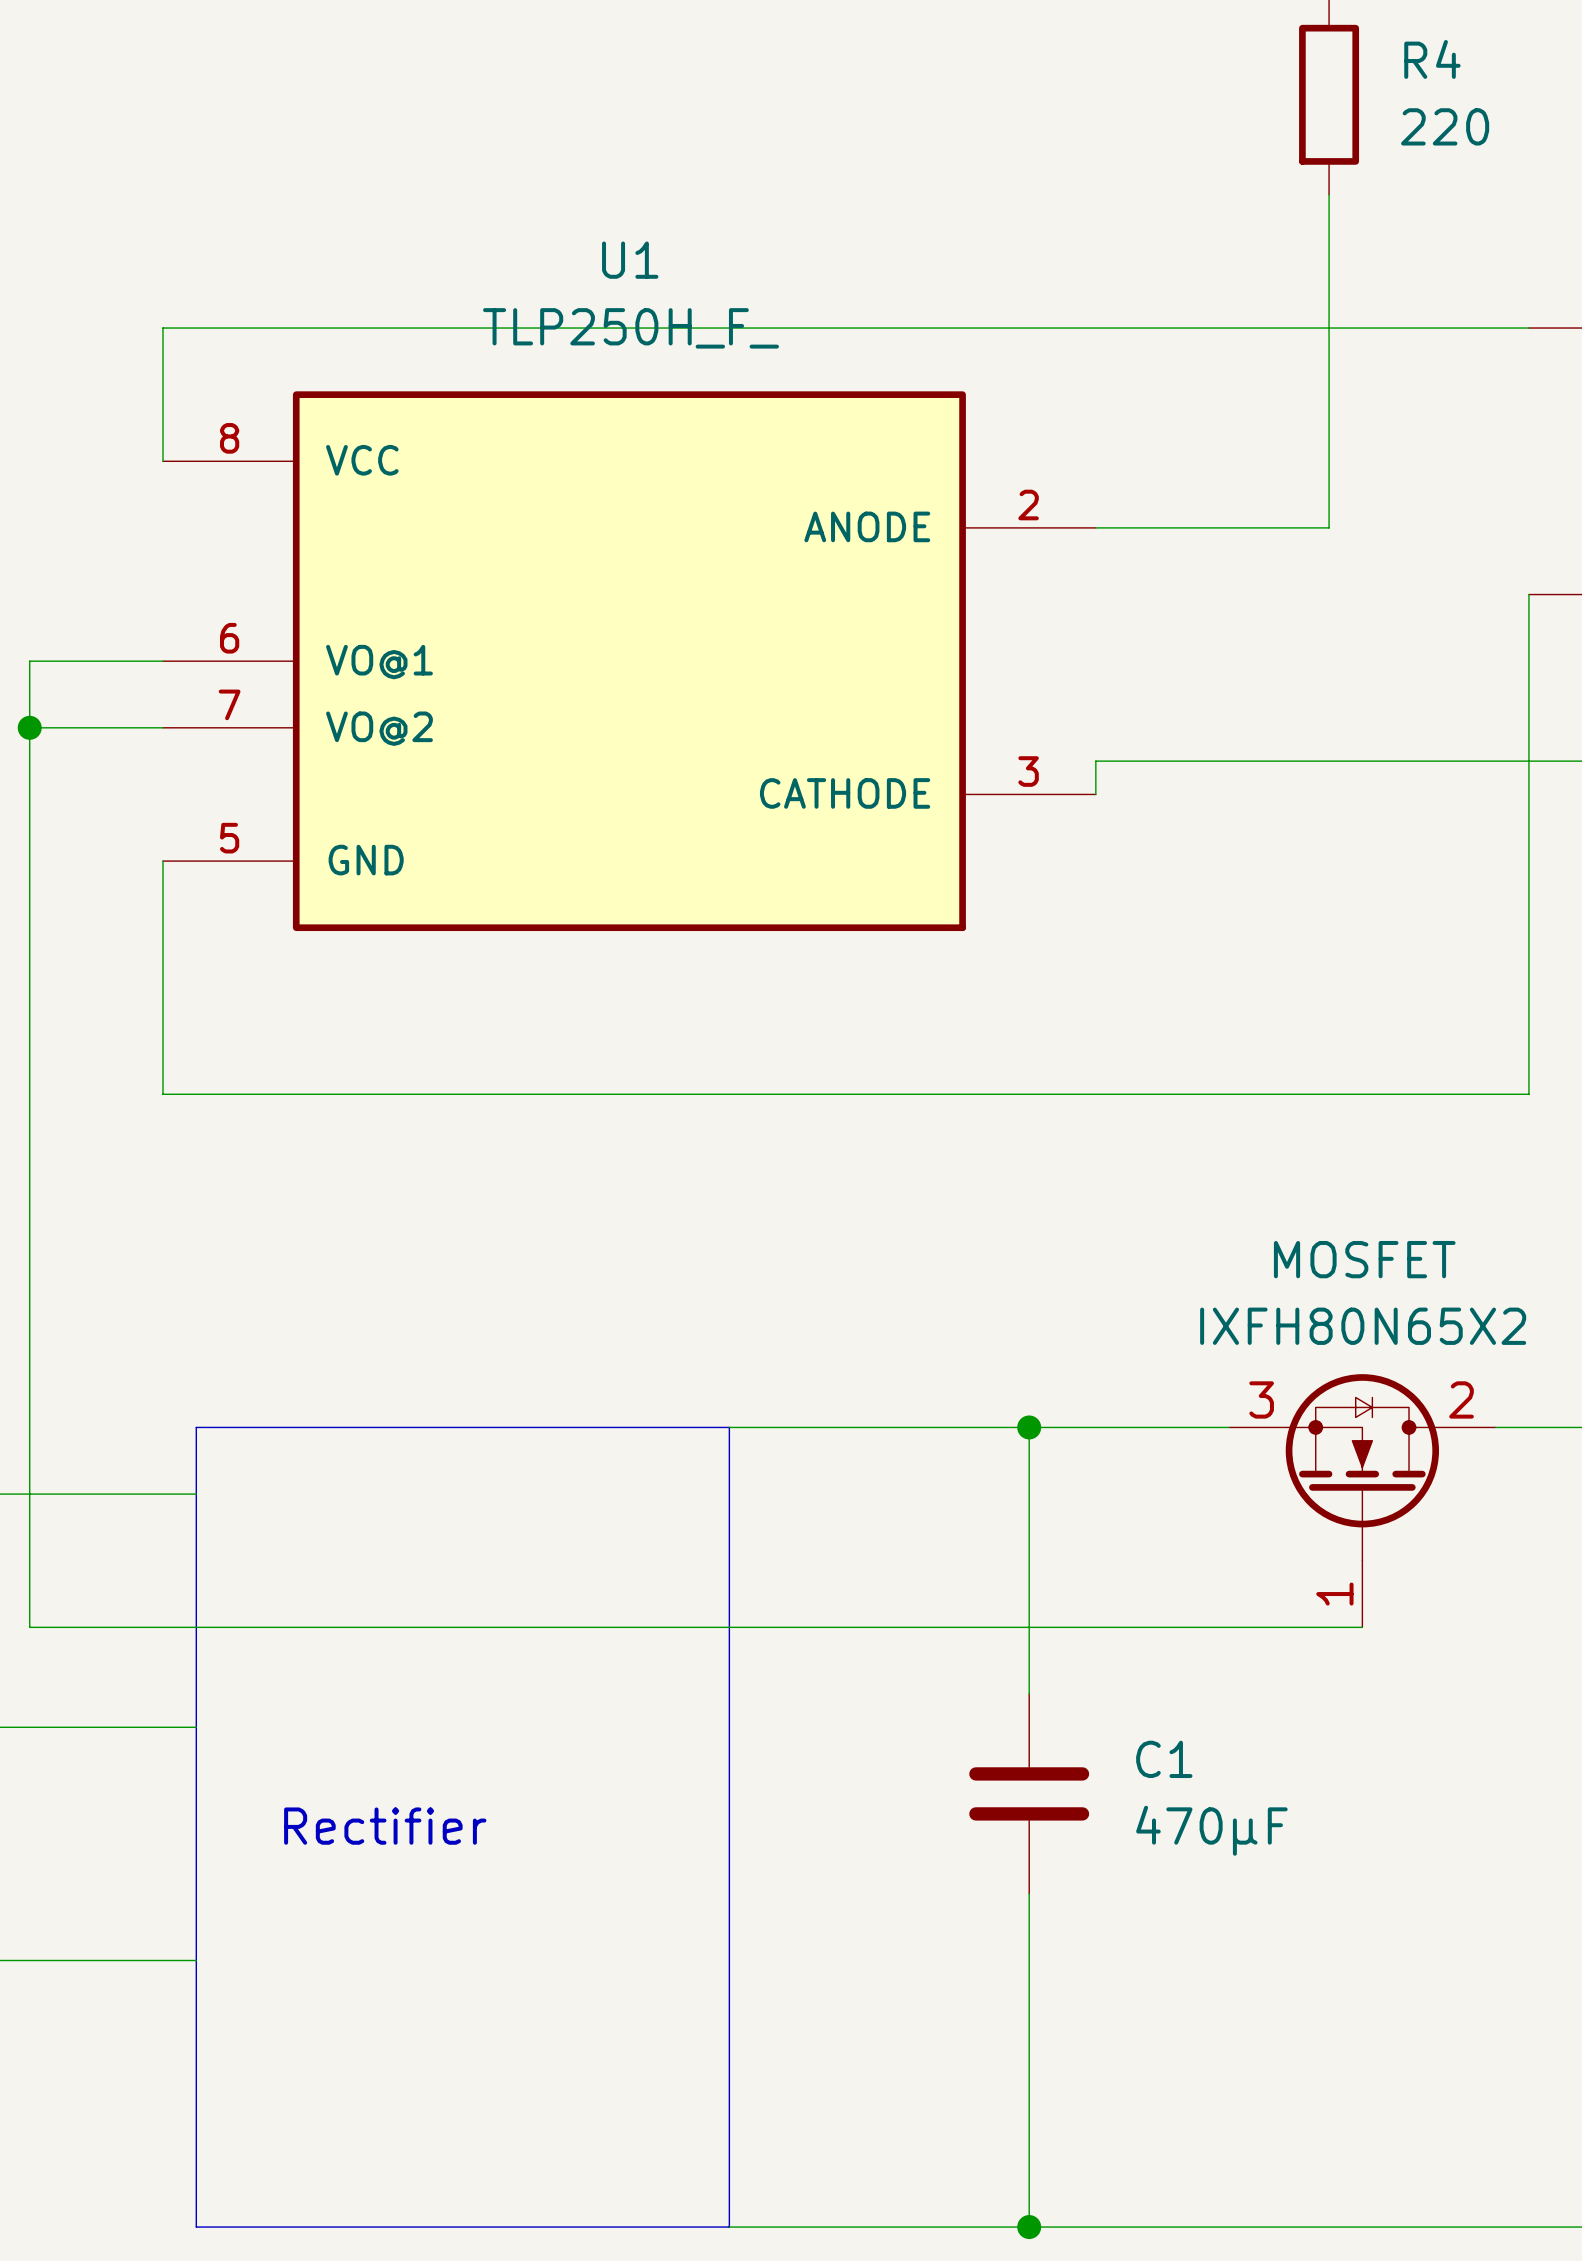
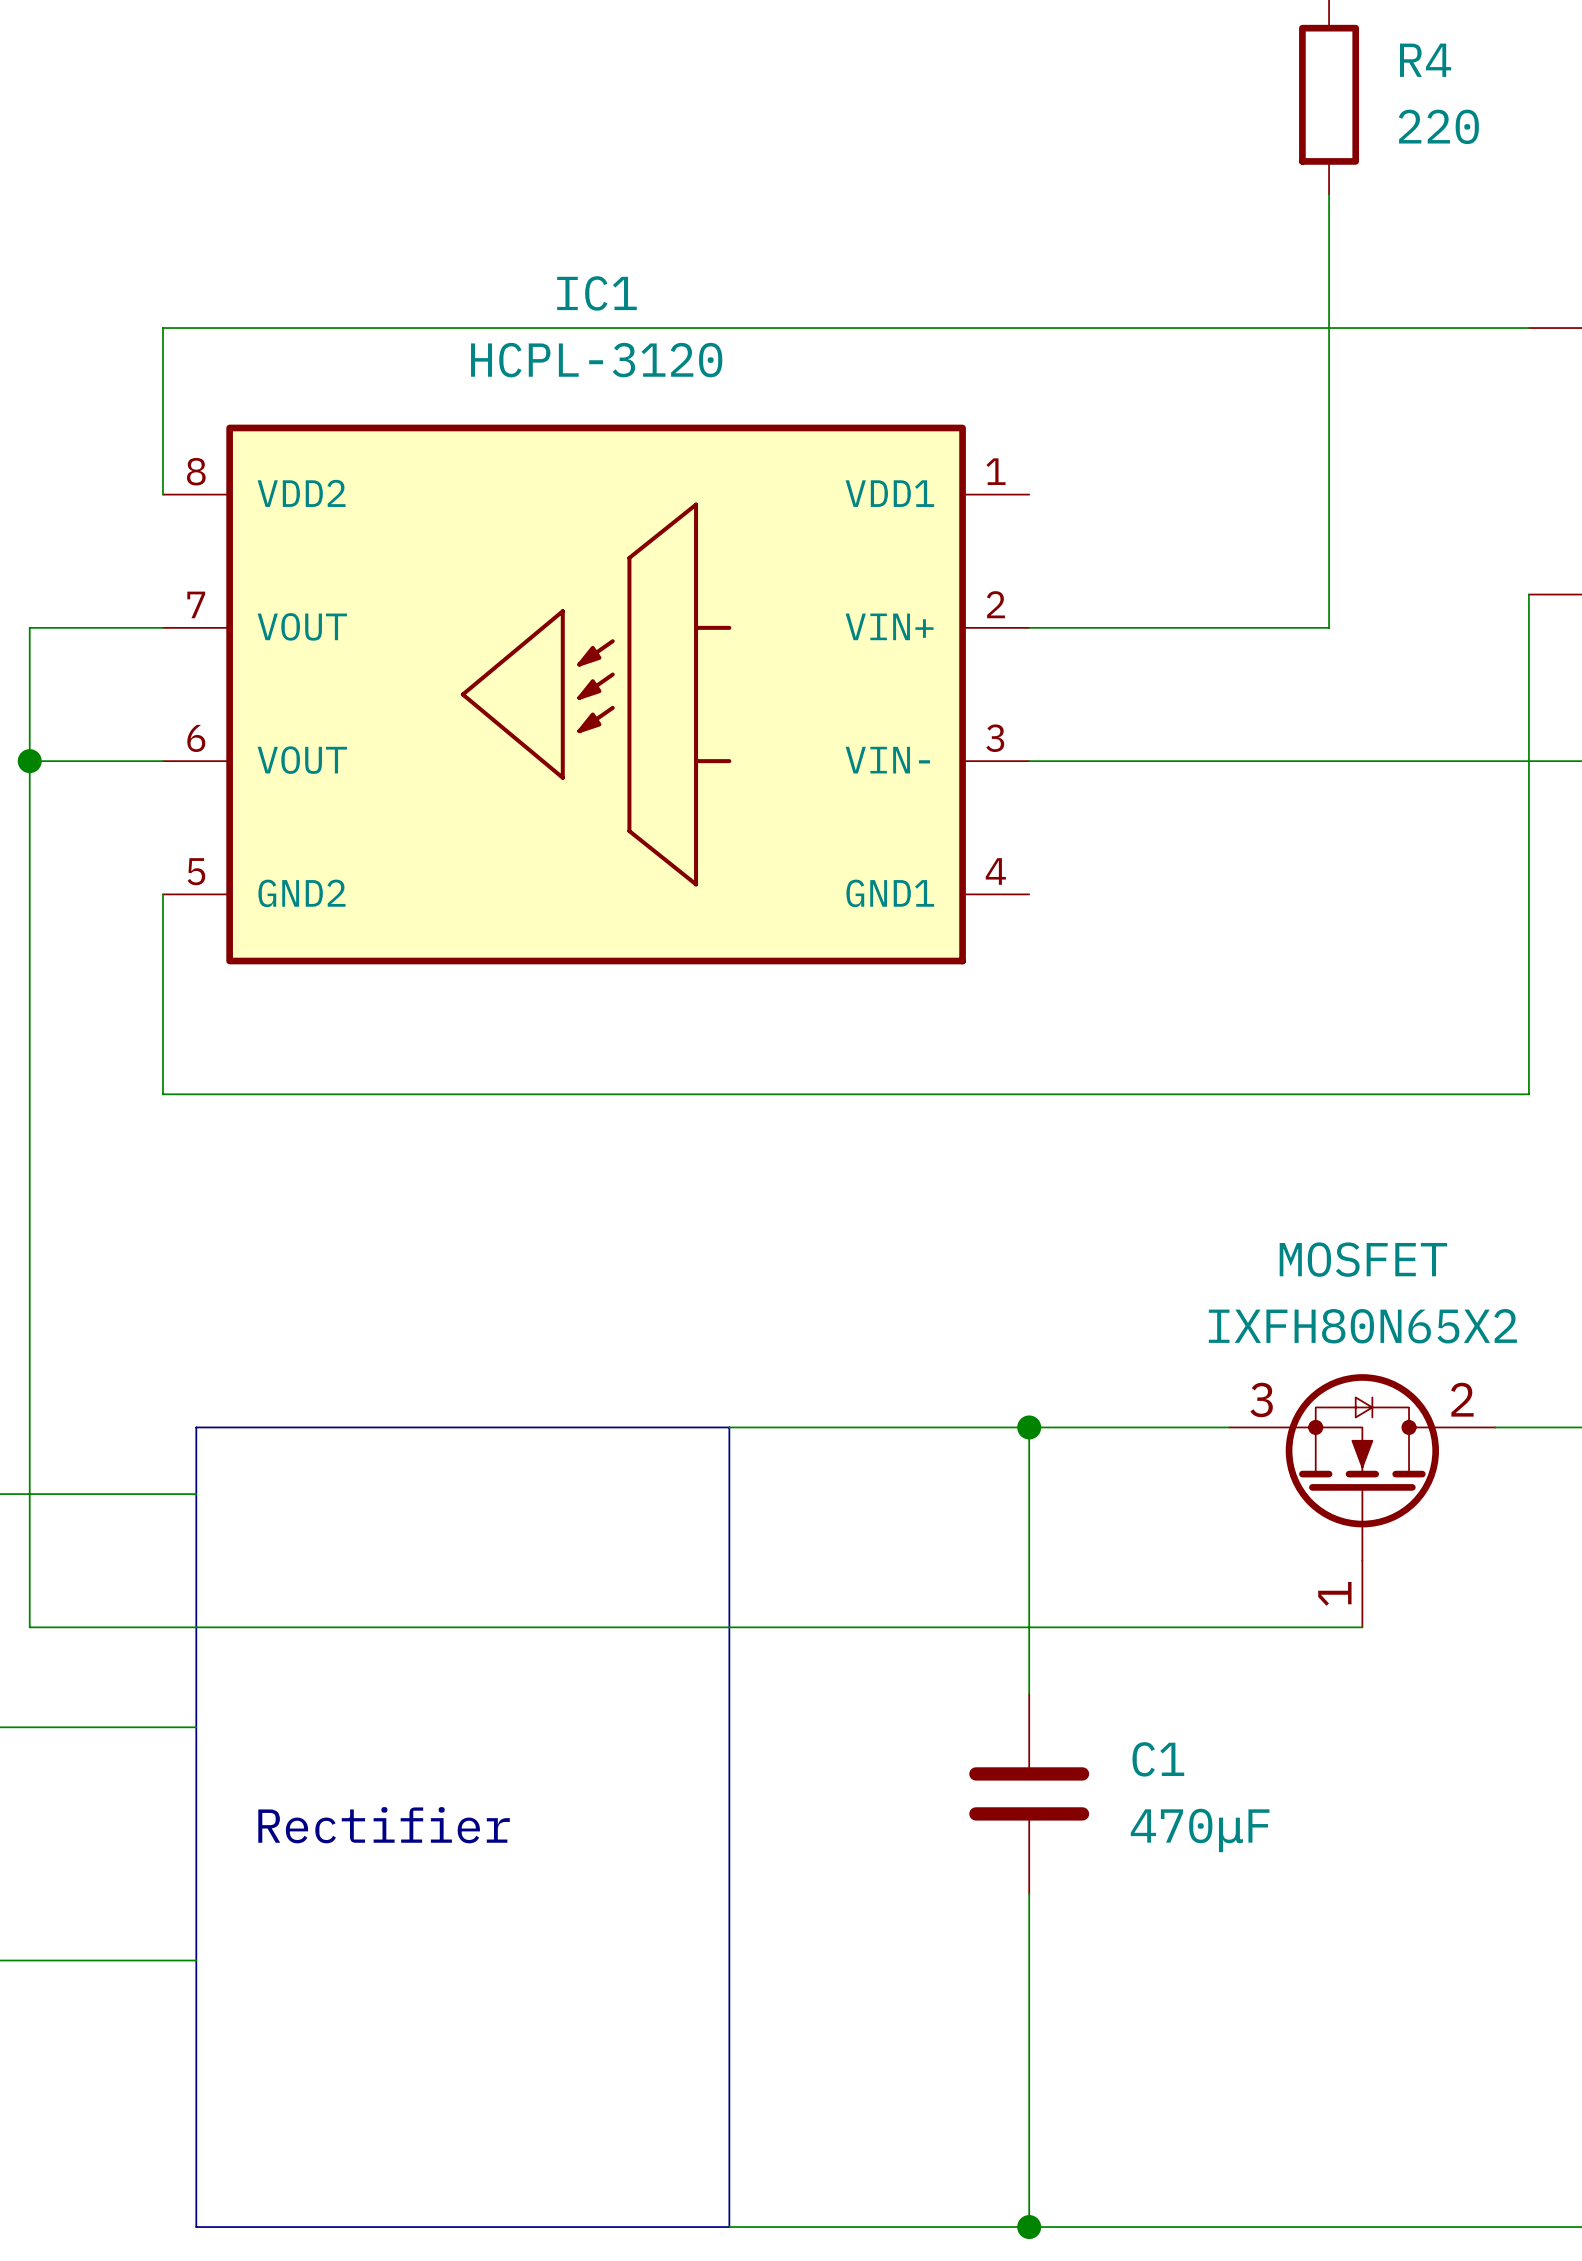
wire: (1095, 527) (1329, 527) -> (1029, 627) (1329, 627) (1329, 527)
wire: (29, 661) (162, 661) -> (29, 661) (29, 627) (162, 627)
U1: TLP250H_F_ (629, 661) -> none
IC1: none -> HCPL-3120 (596, 694)
wire: (29, 727) (162, 727) -> (29, 761) (162, 761)
junction position: (29, 727) -> (29, 761)
wire: (1095, 761) (1095, 794) -> (1095, 761) (1029, 761)
wire: (162, 861) (162, 894) -> (162, 461) (162, 494)

